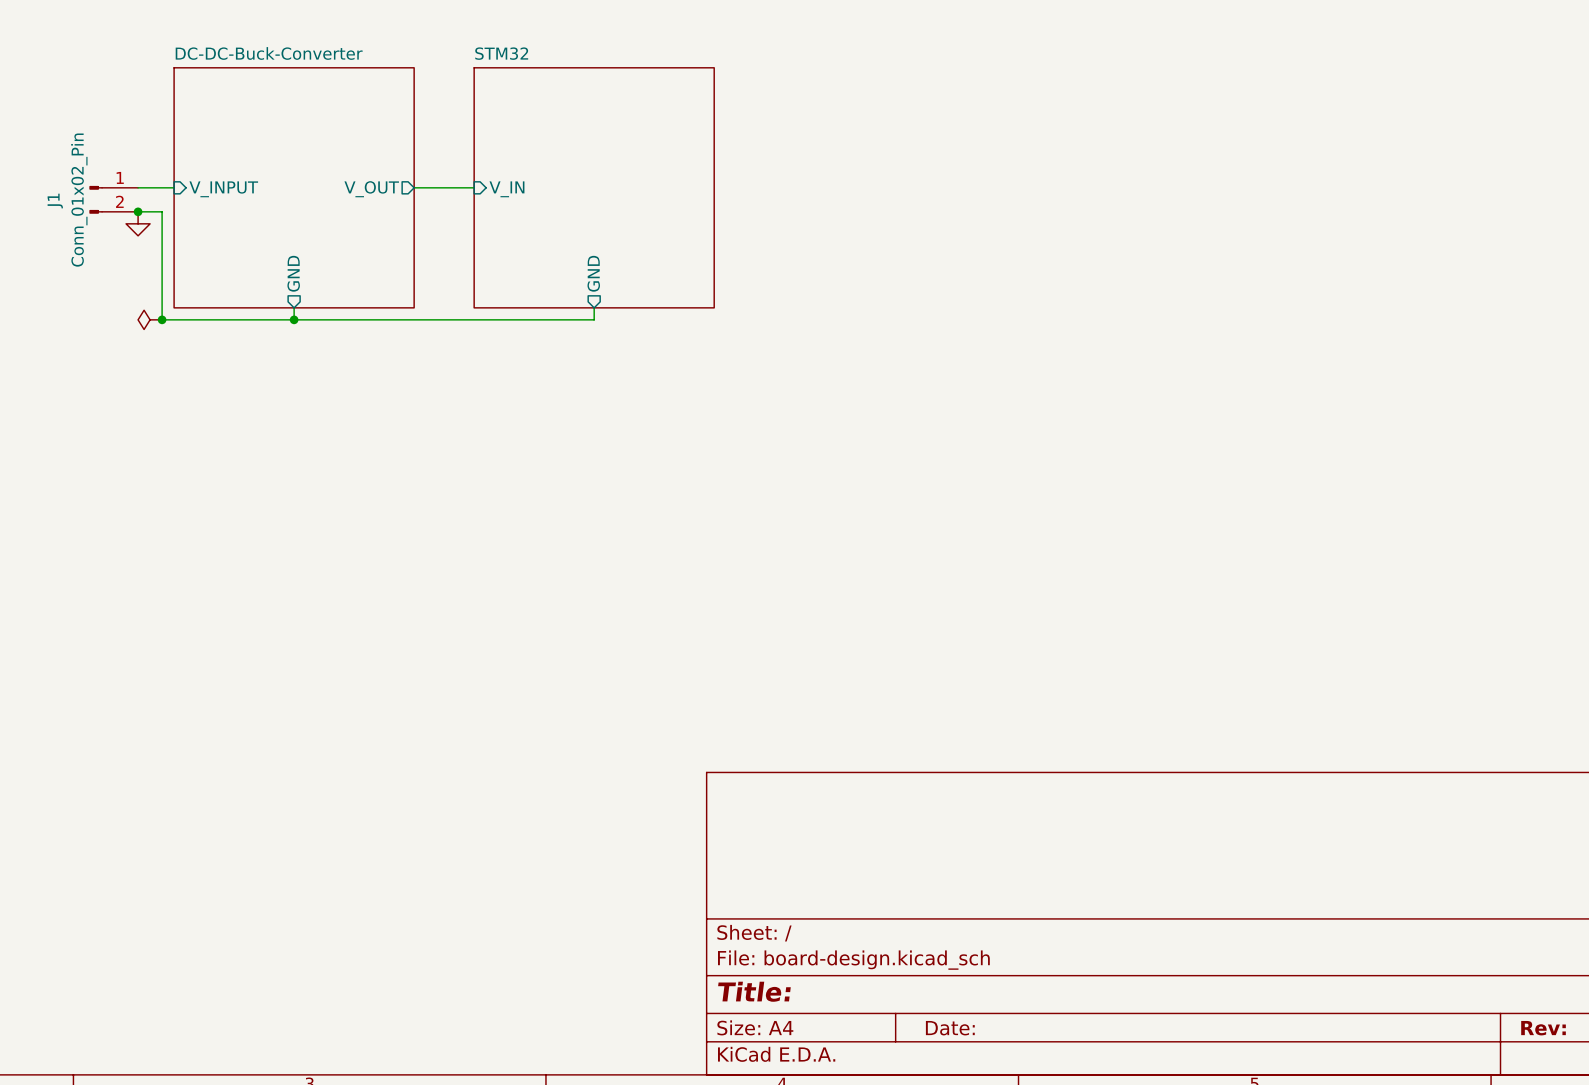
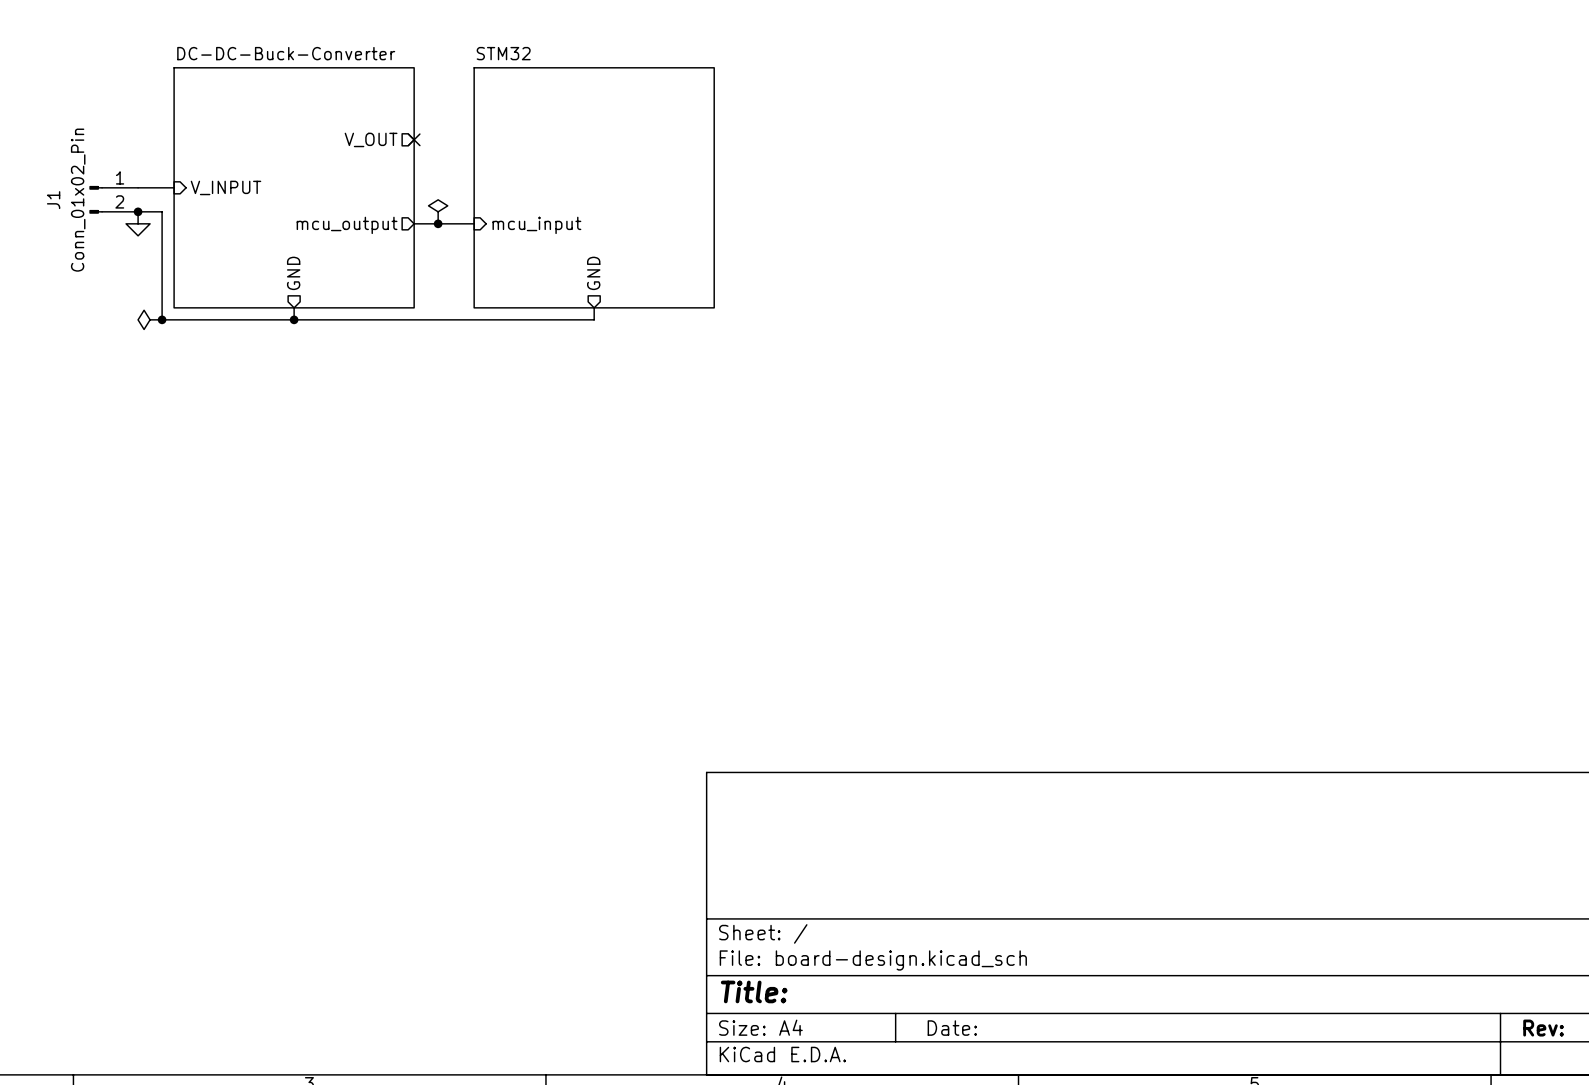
no-connect mark: none -> (414, 139)
wire: (414, 187) (474, 187) -> (414, 223) (474, 223)
sheet pin position: V_OUT (371, 189) -> V_OUT (371, 139)
sheet pin: V_IN (506, 189) -> none
power symbol: none -> (438, 211)
junction: none -> (438, 223)
sheet pin: none -> mcu_output (347, 225)
sheet pin: none -> mcu_input (536, 225)

